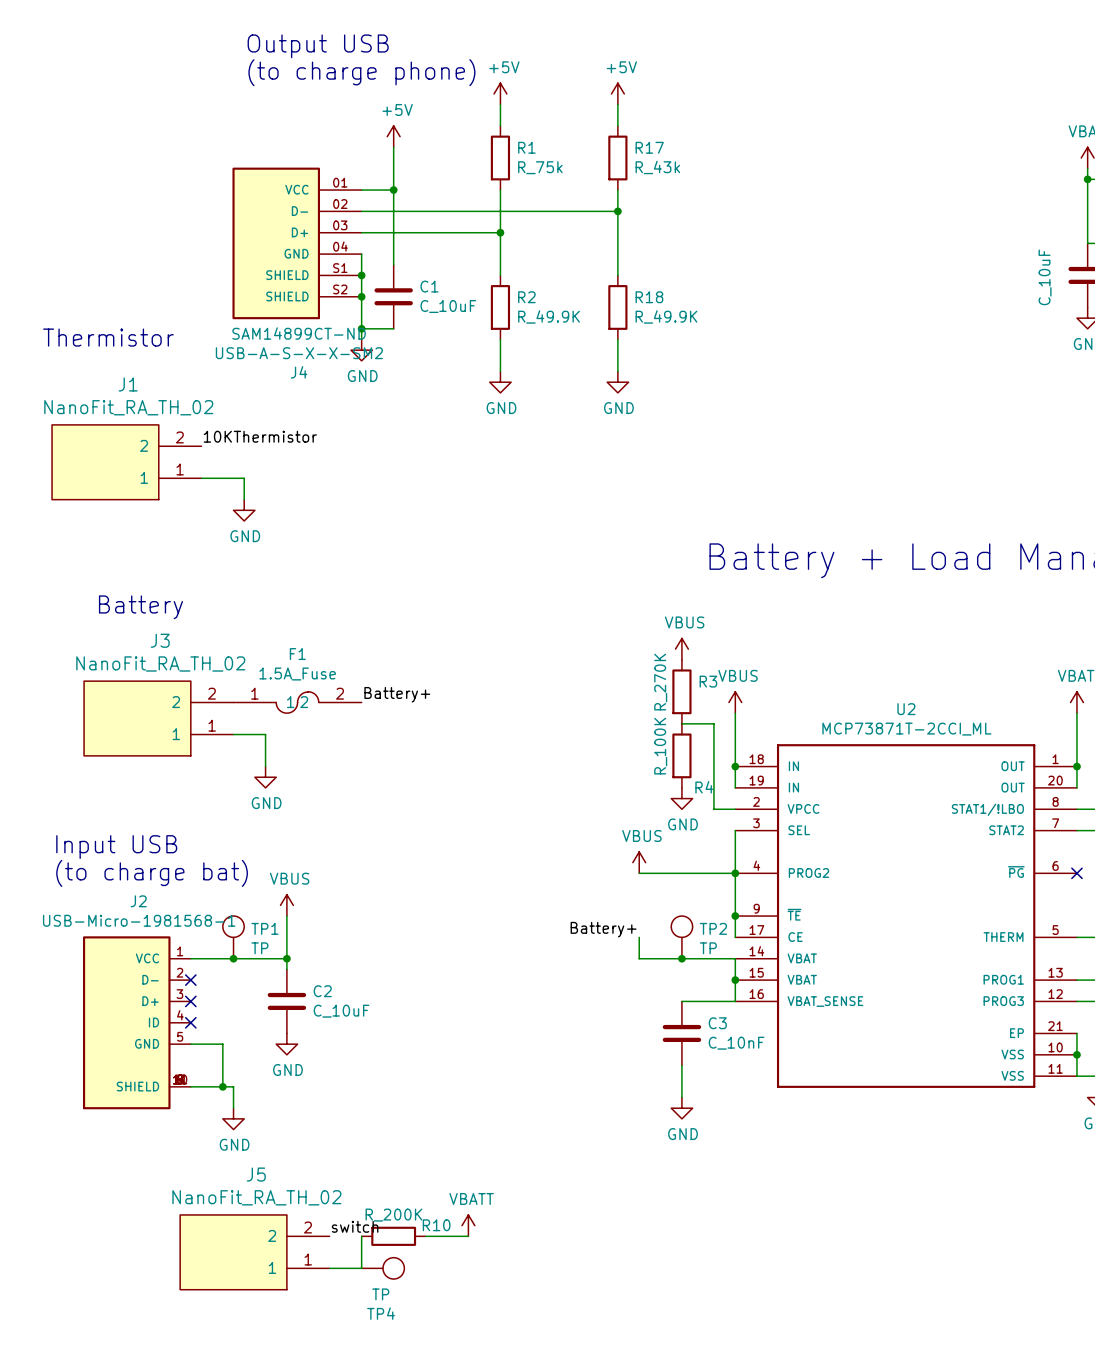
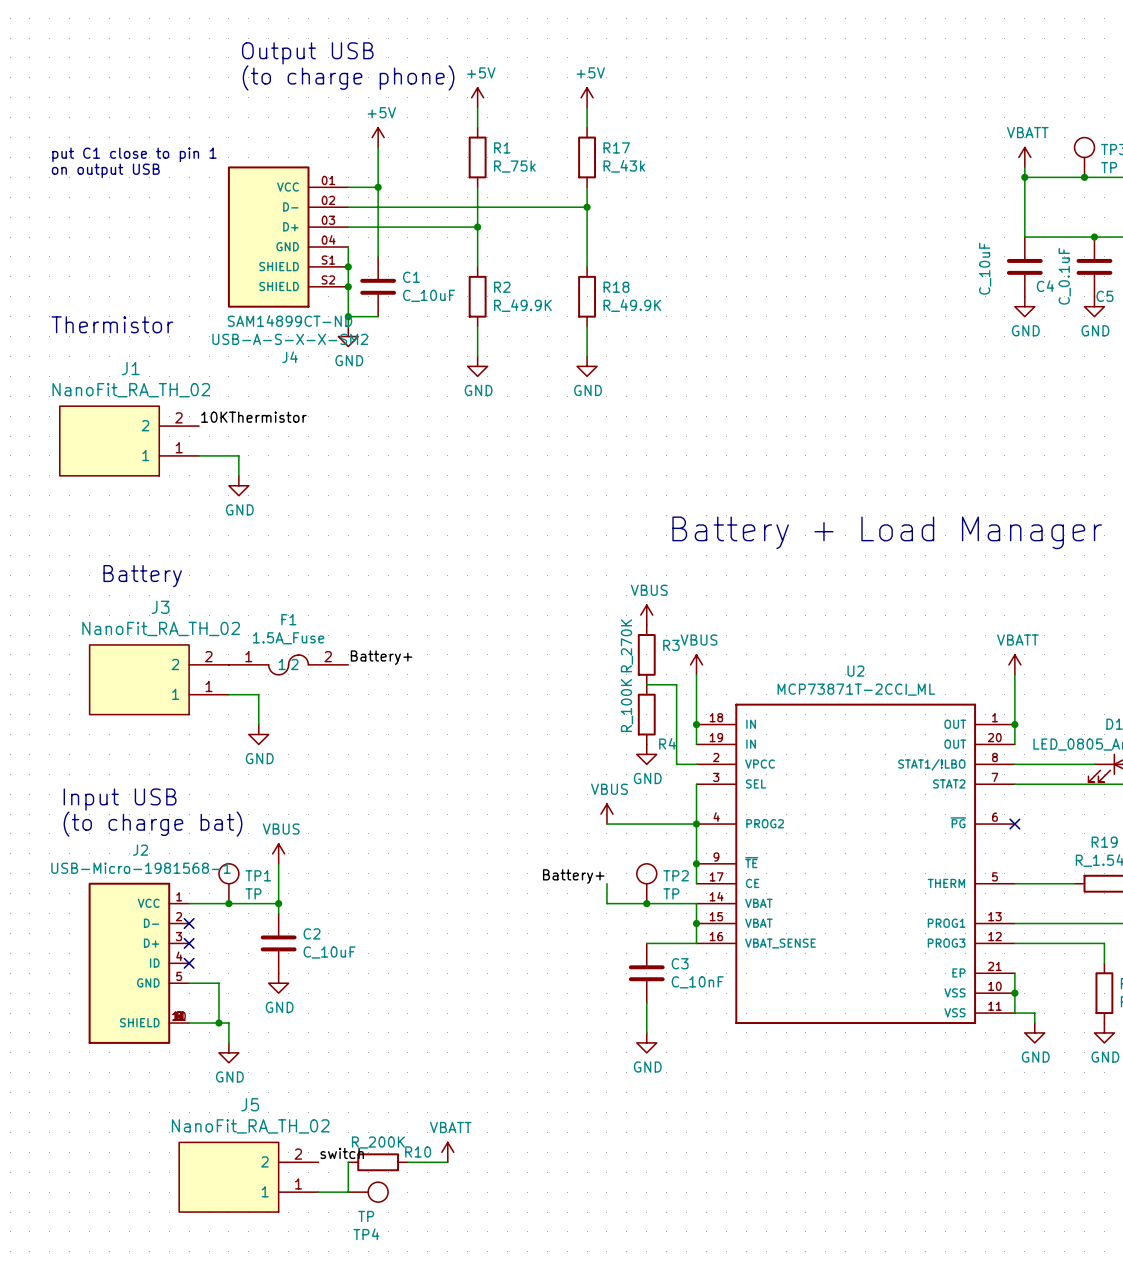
text: none -> put C1 close to pin 1 (134, 154)
text: none -> on output USB (105, 170)

